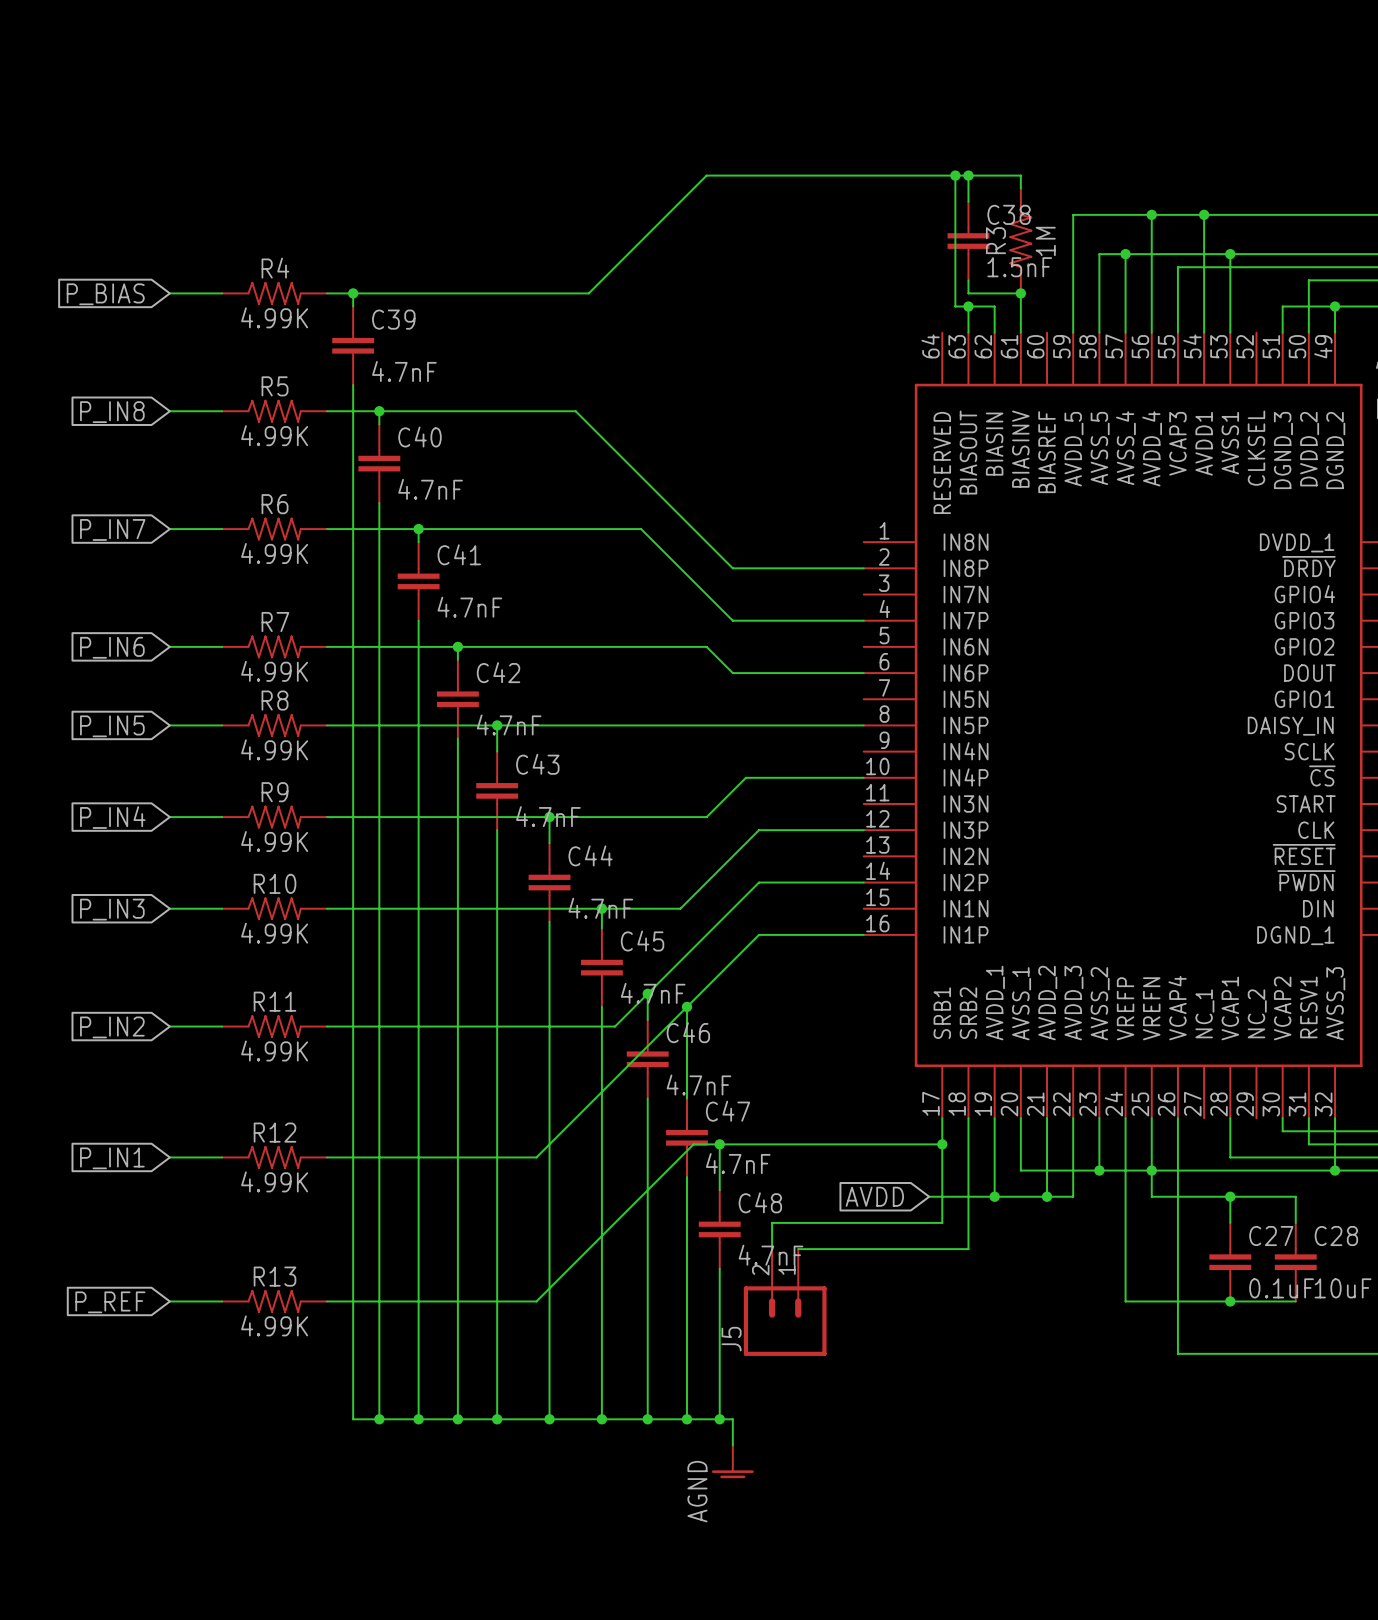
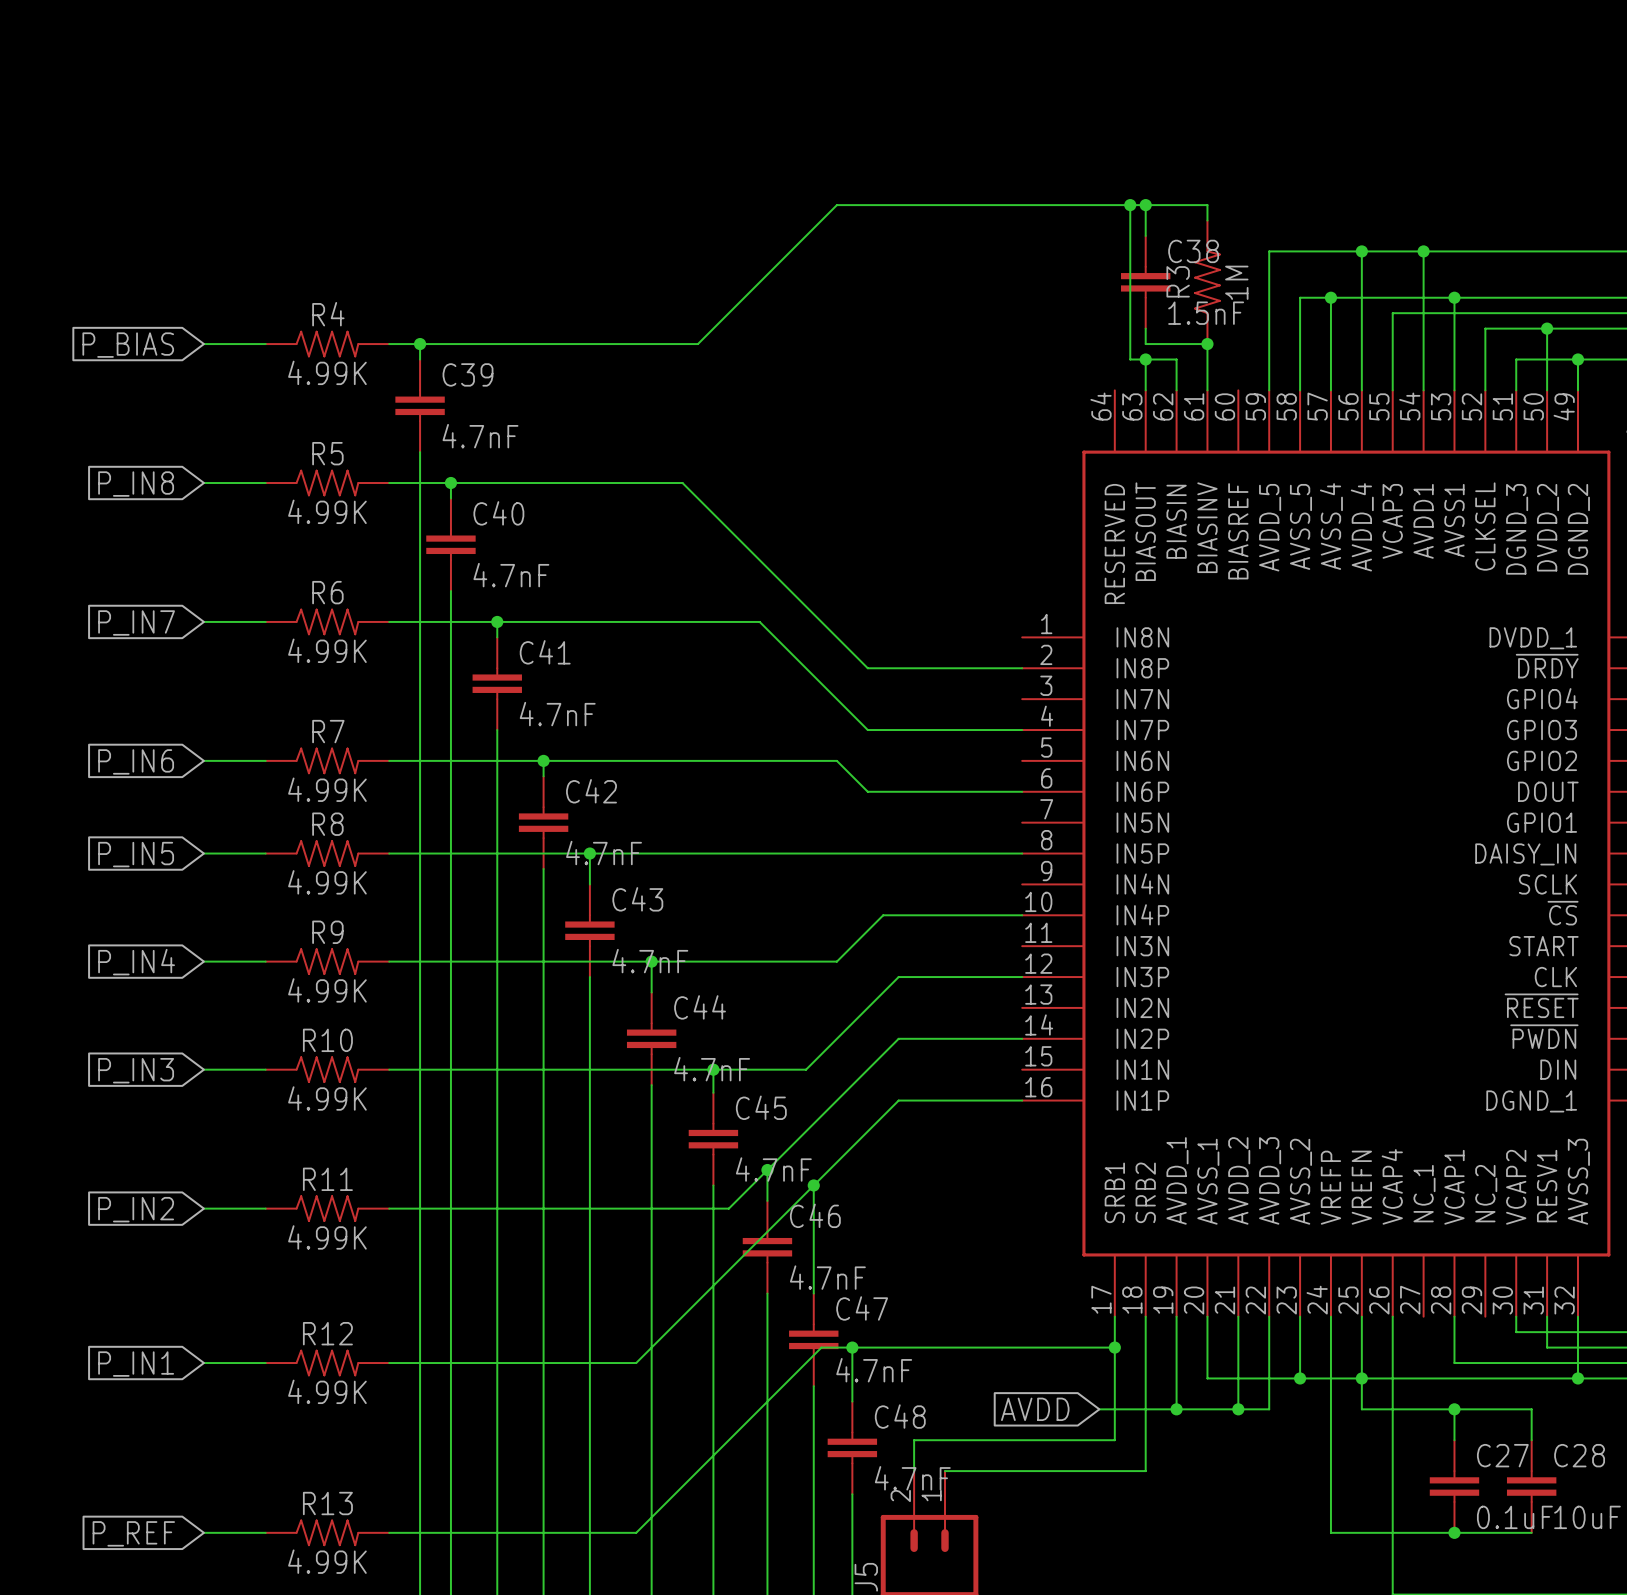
wire: none -> (1547, 328) (1485, 328) (1485, 390)
junction: none -> (1547, 328)

